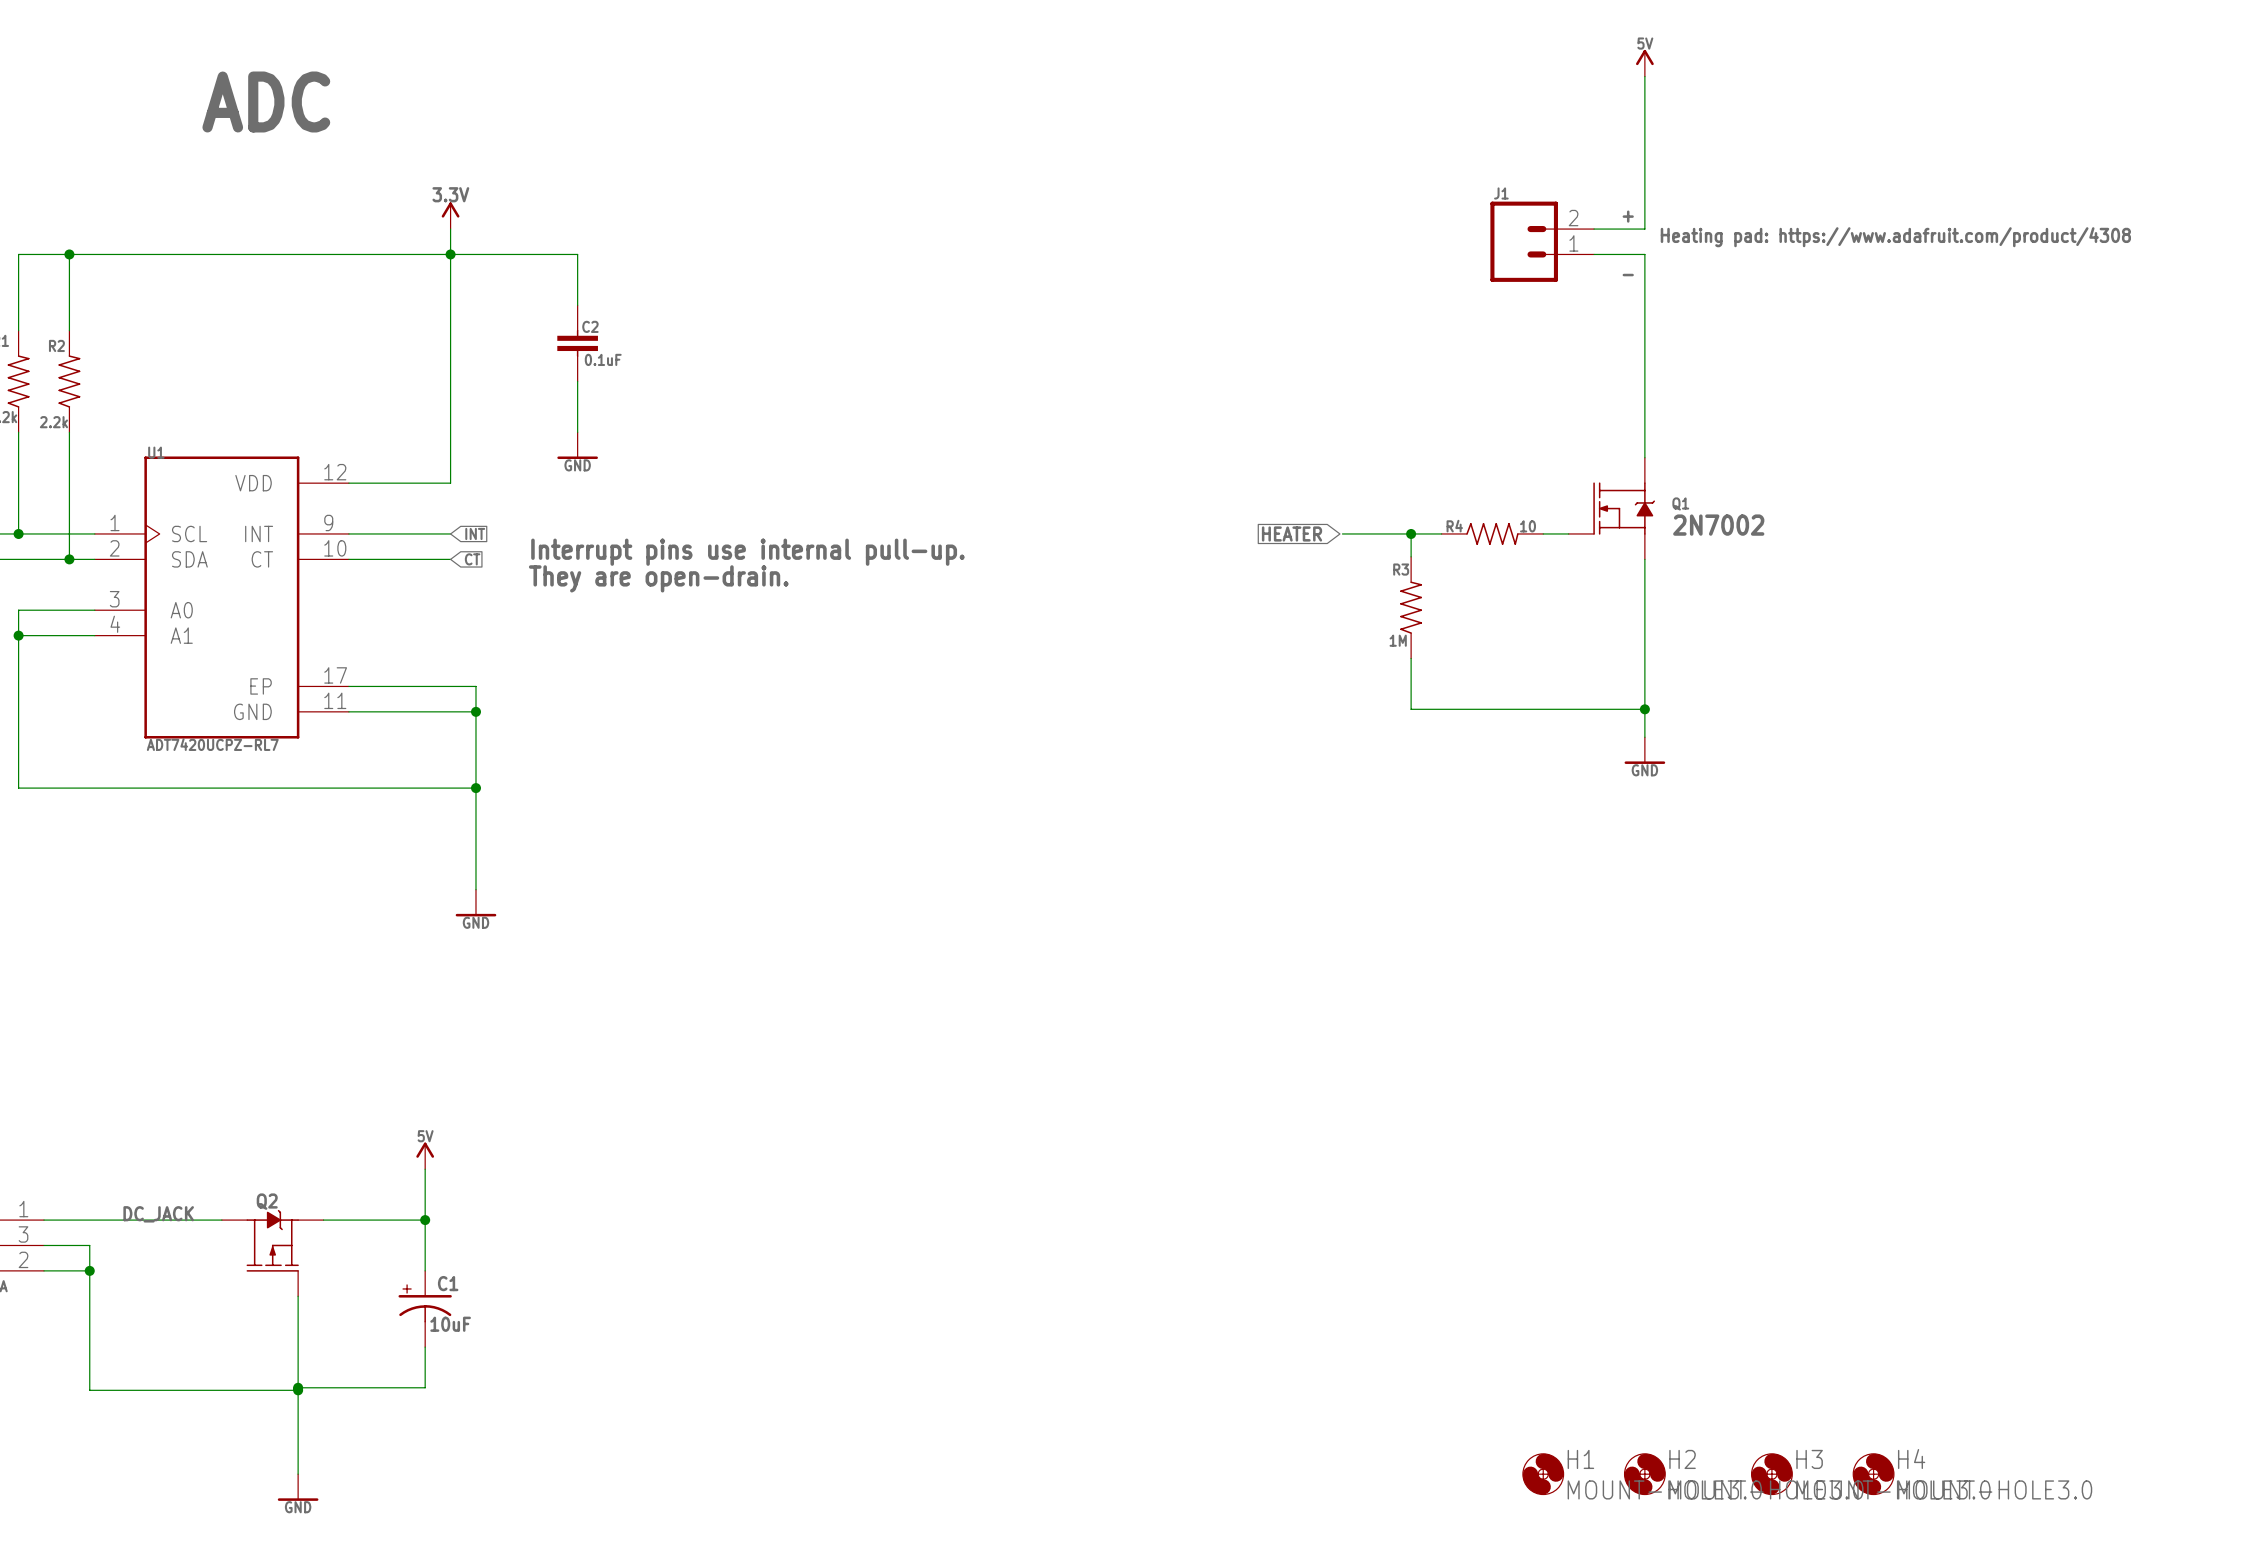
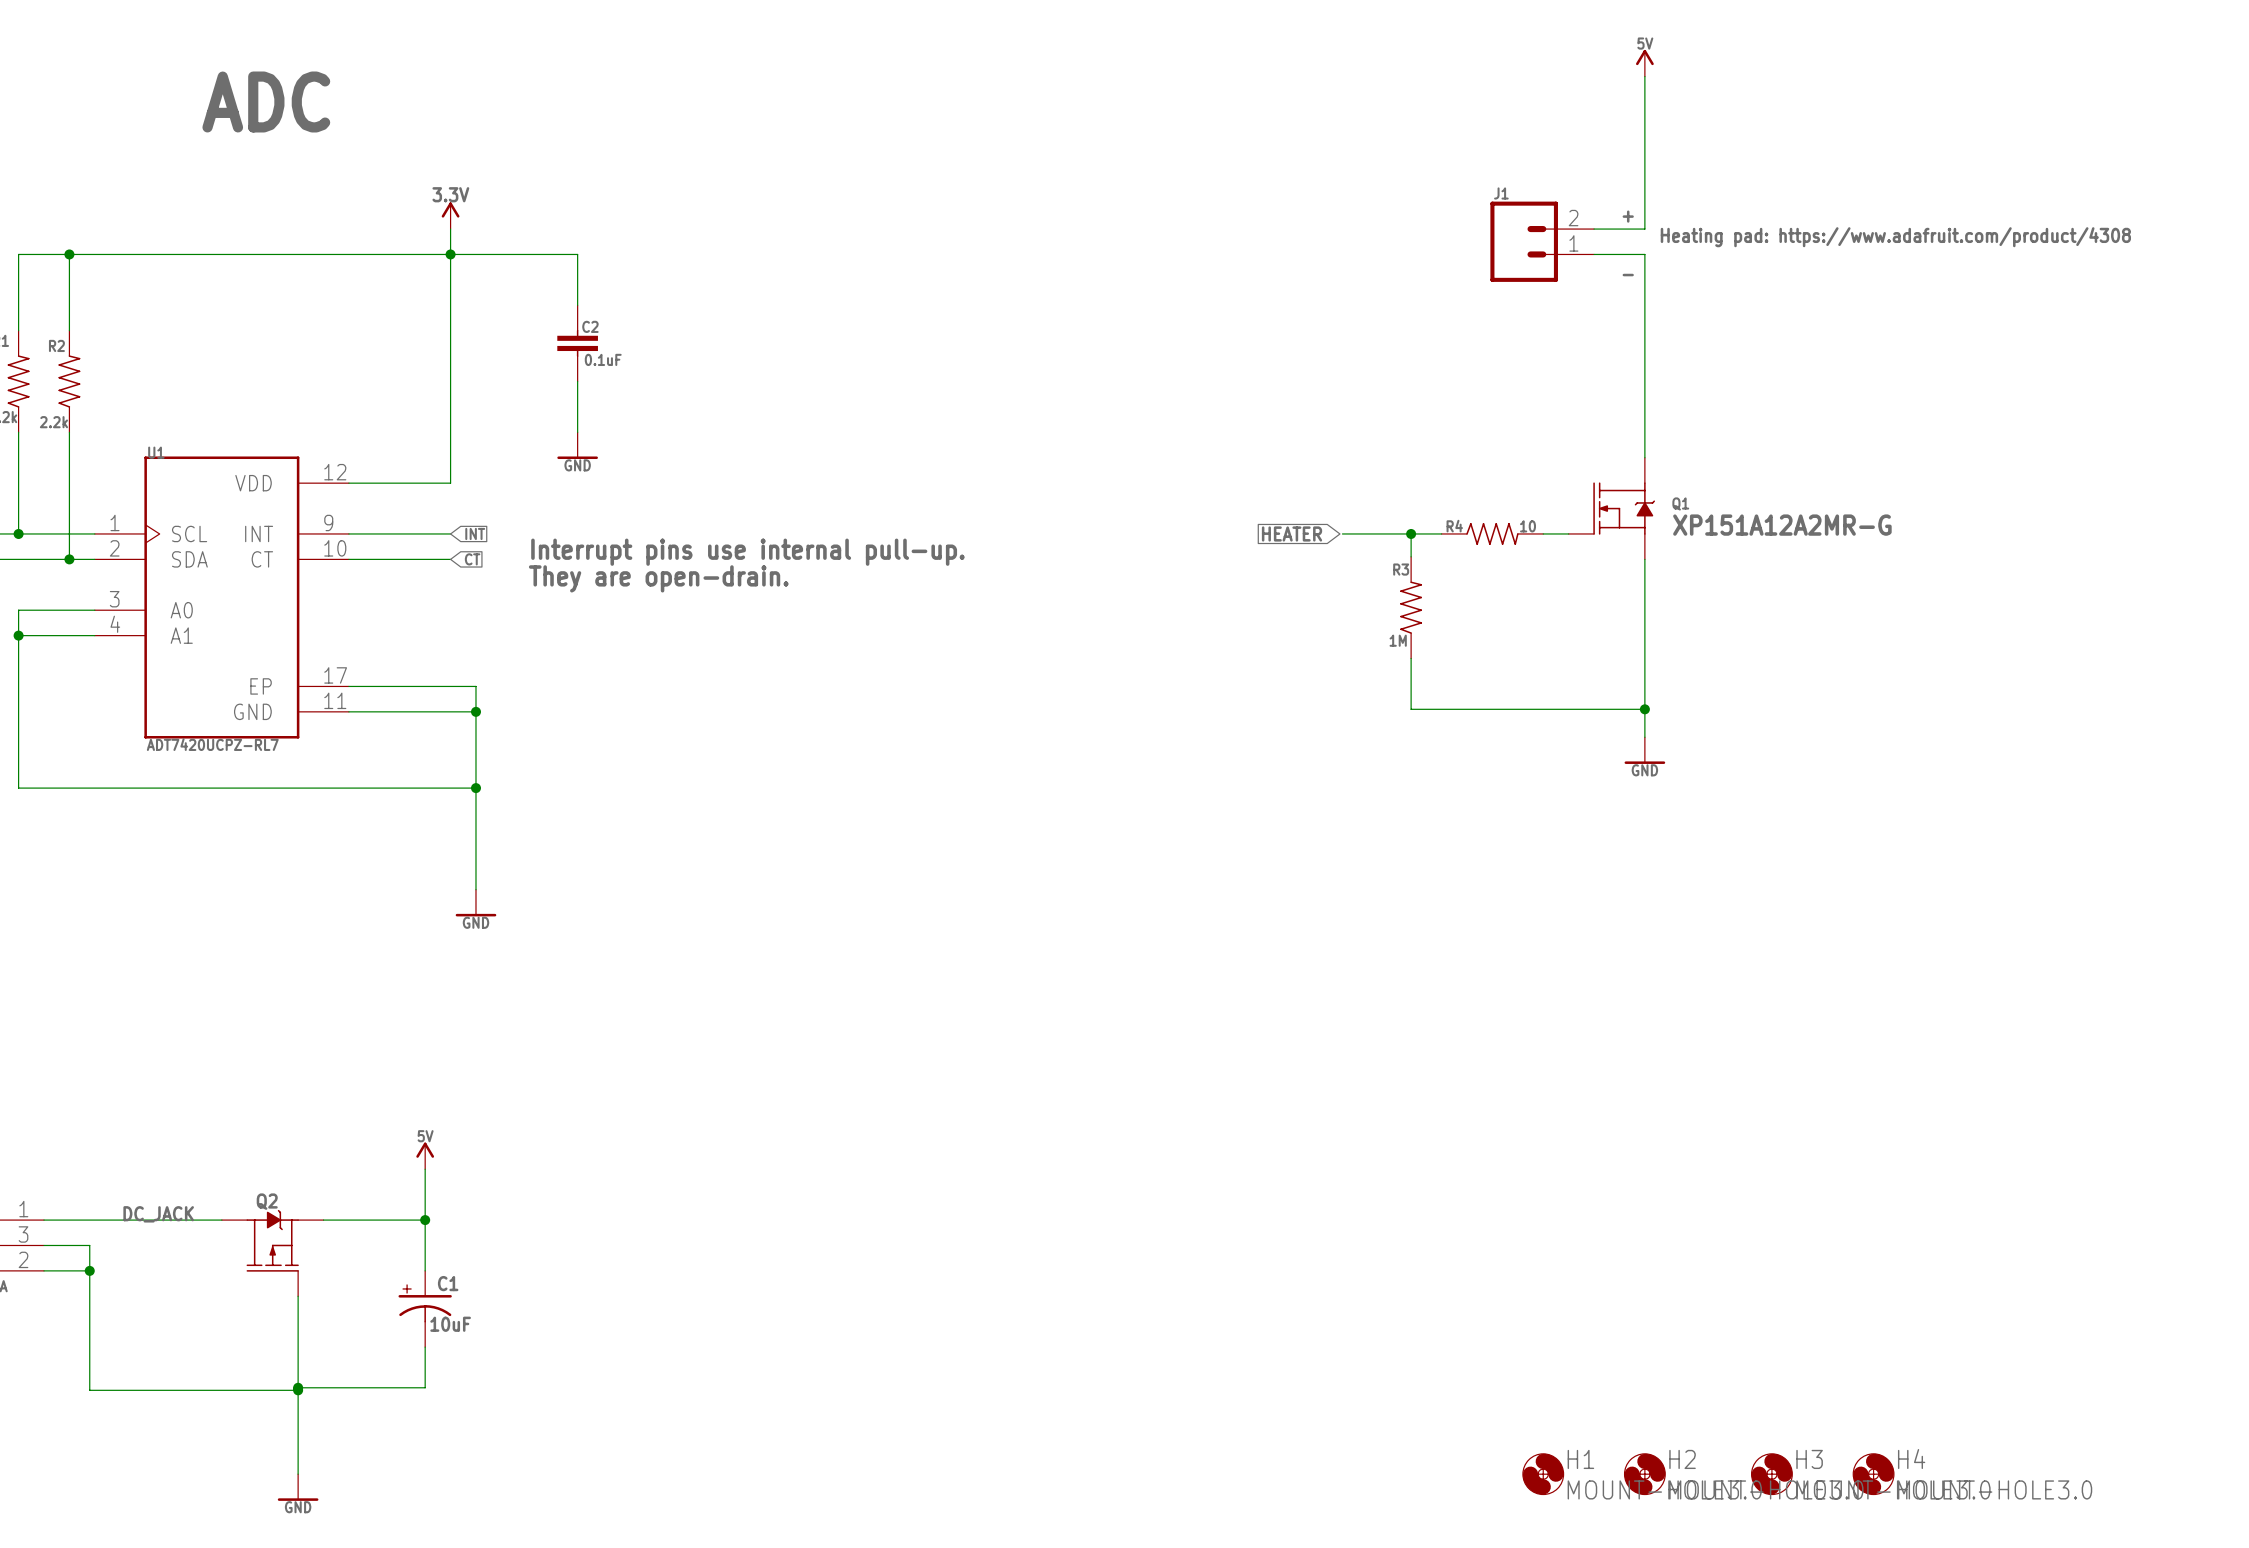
Q1 value: 2N7002 (1718, 525) -> XP151A12A2MR-G (1782, 525)

